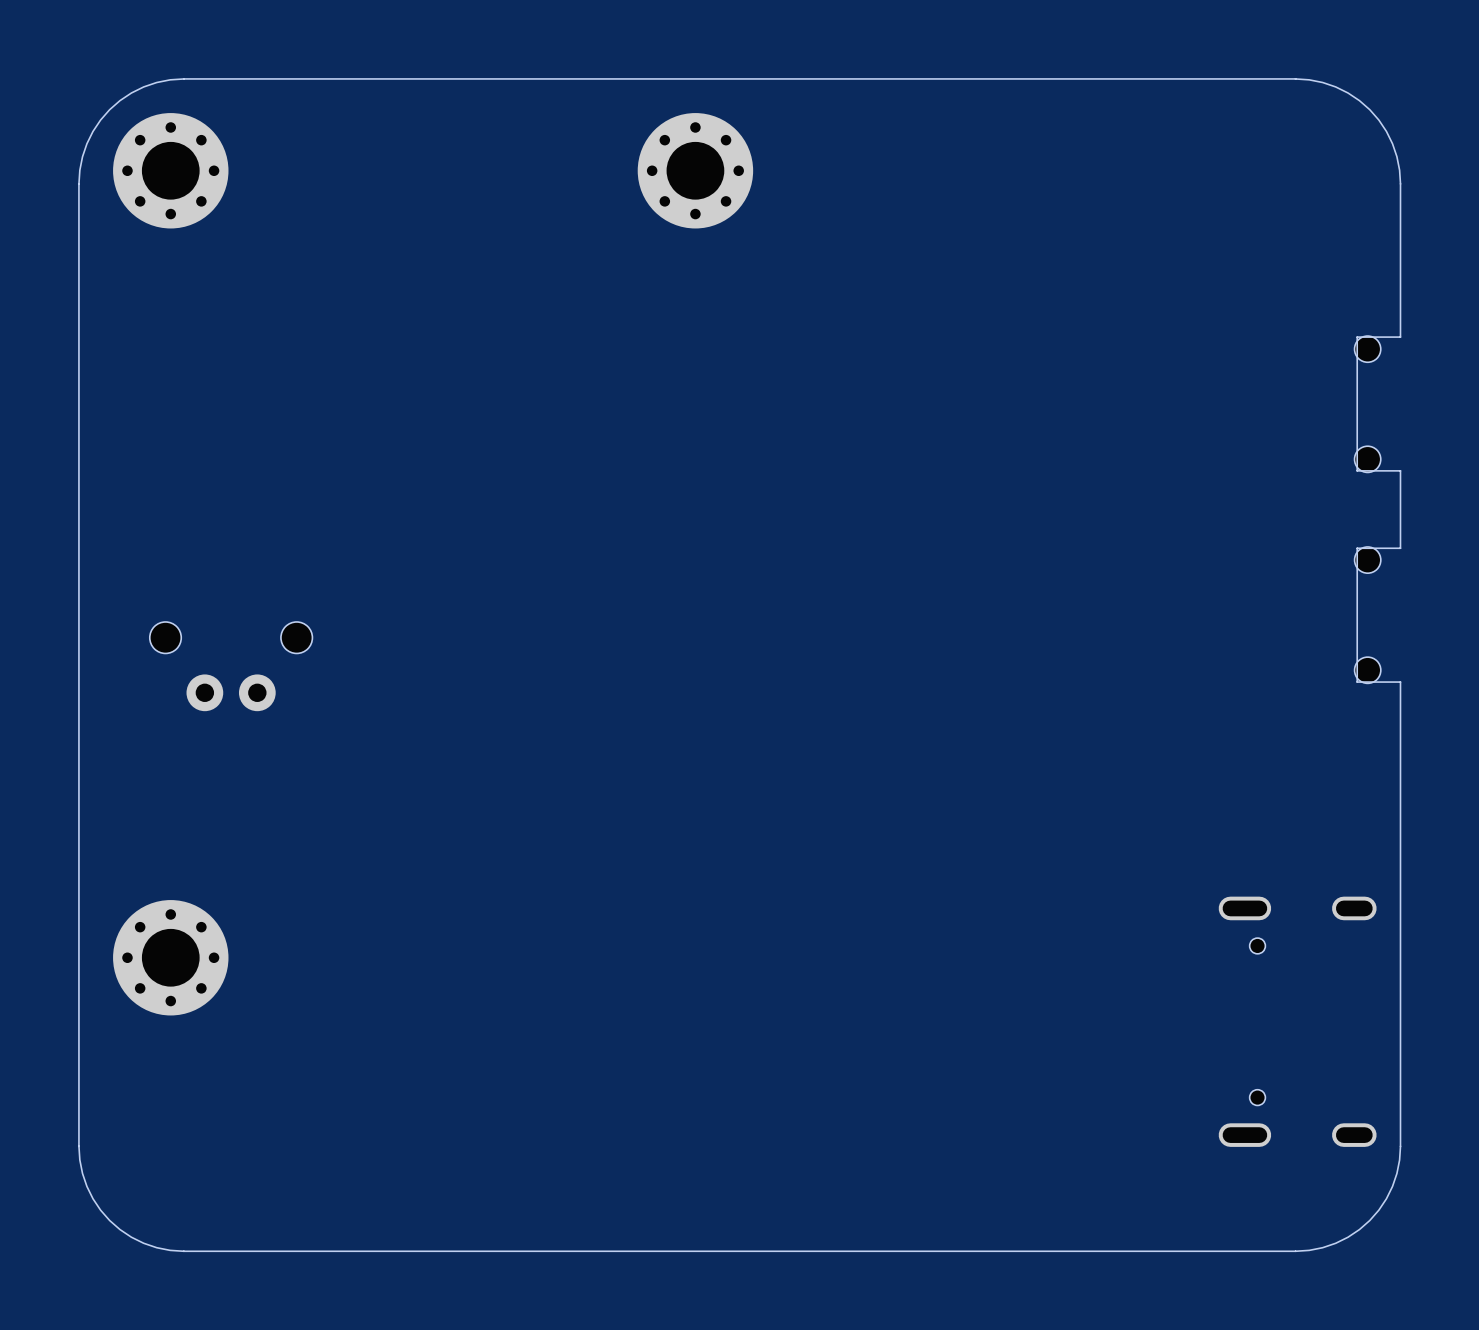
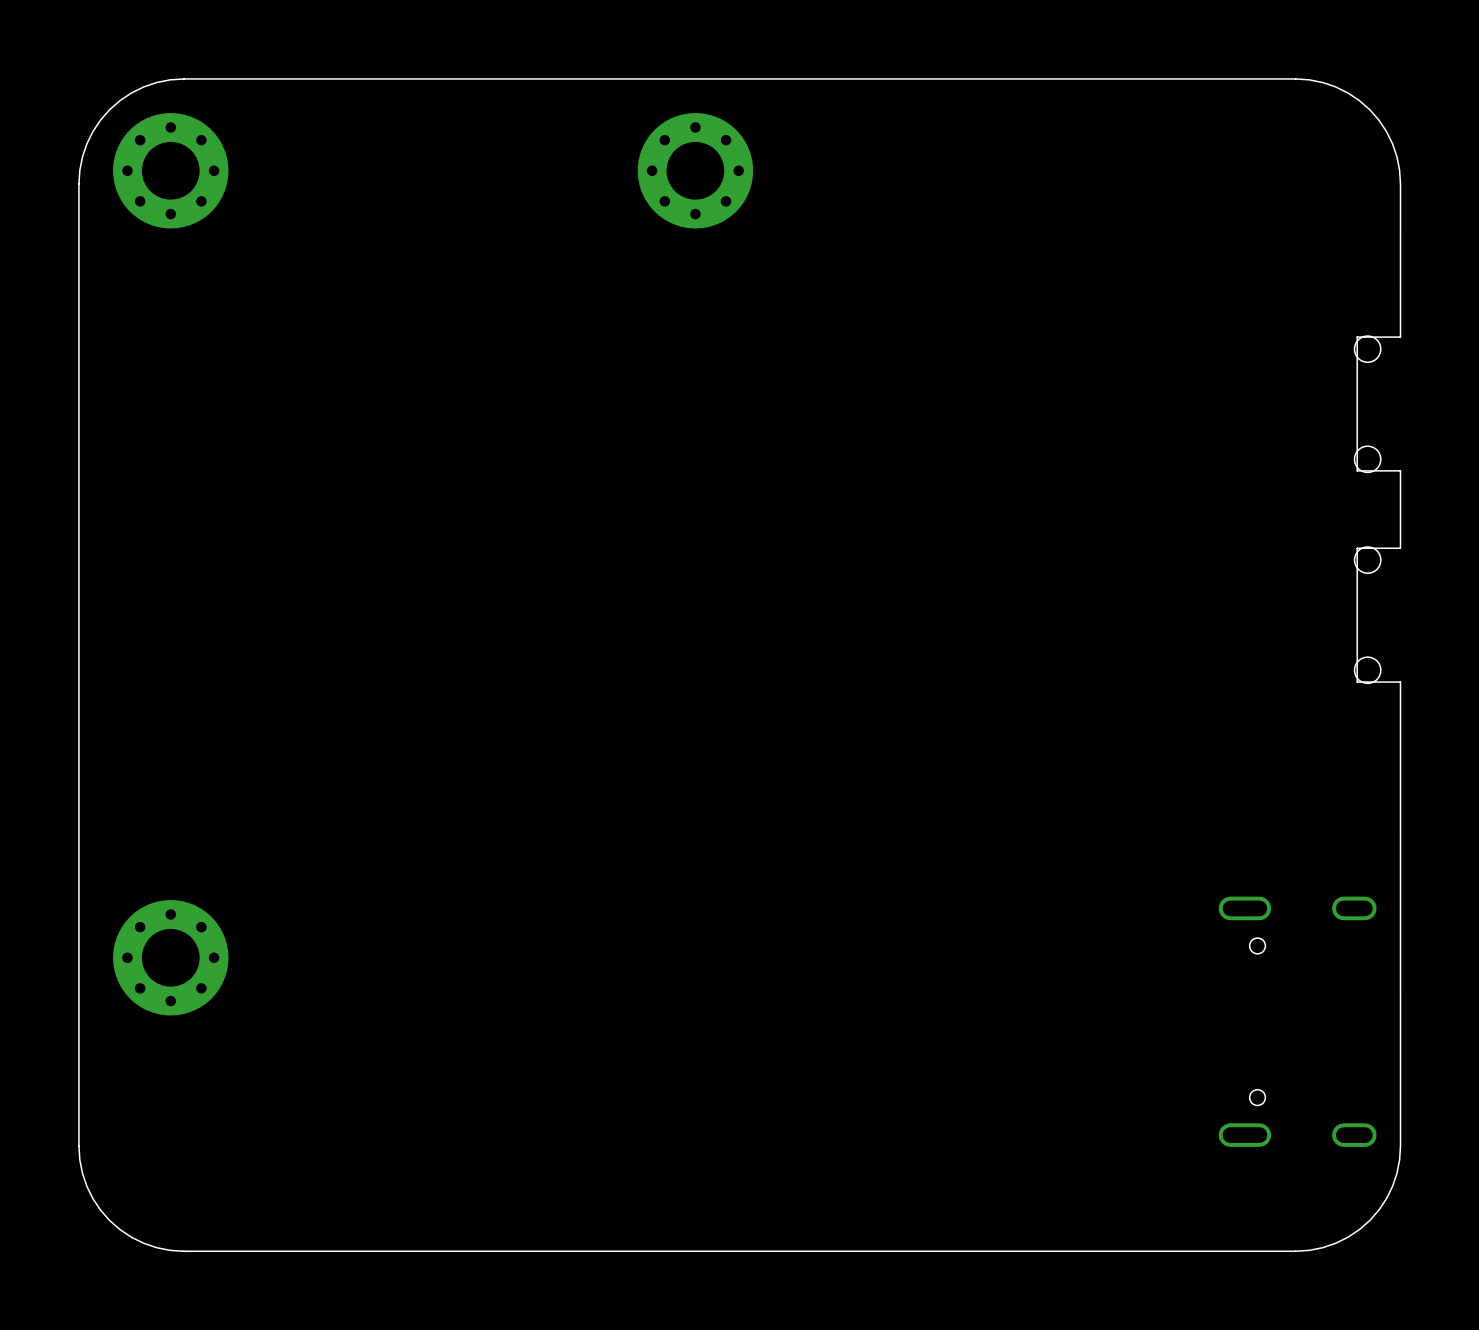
part: (231, 666) -> none

